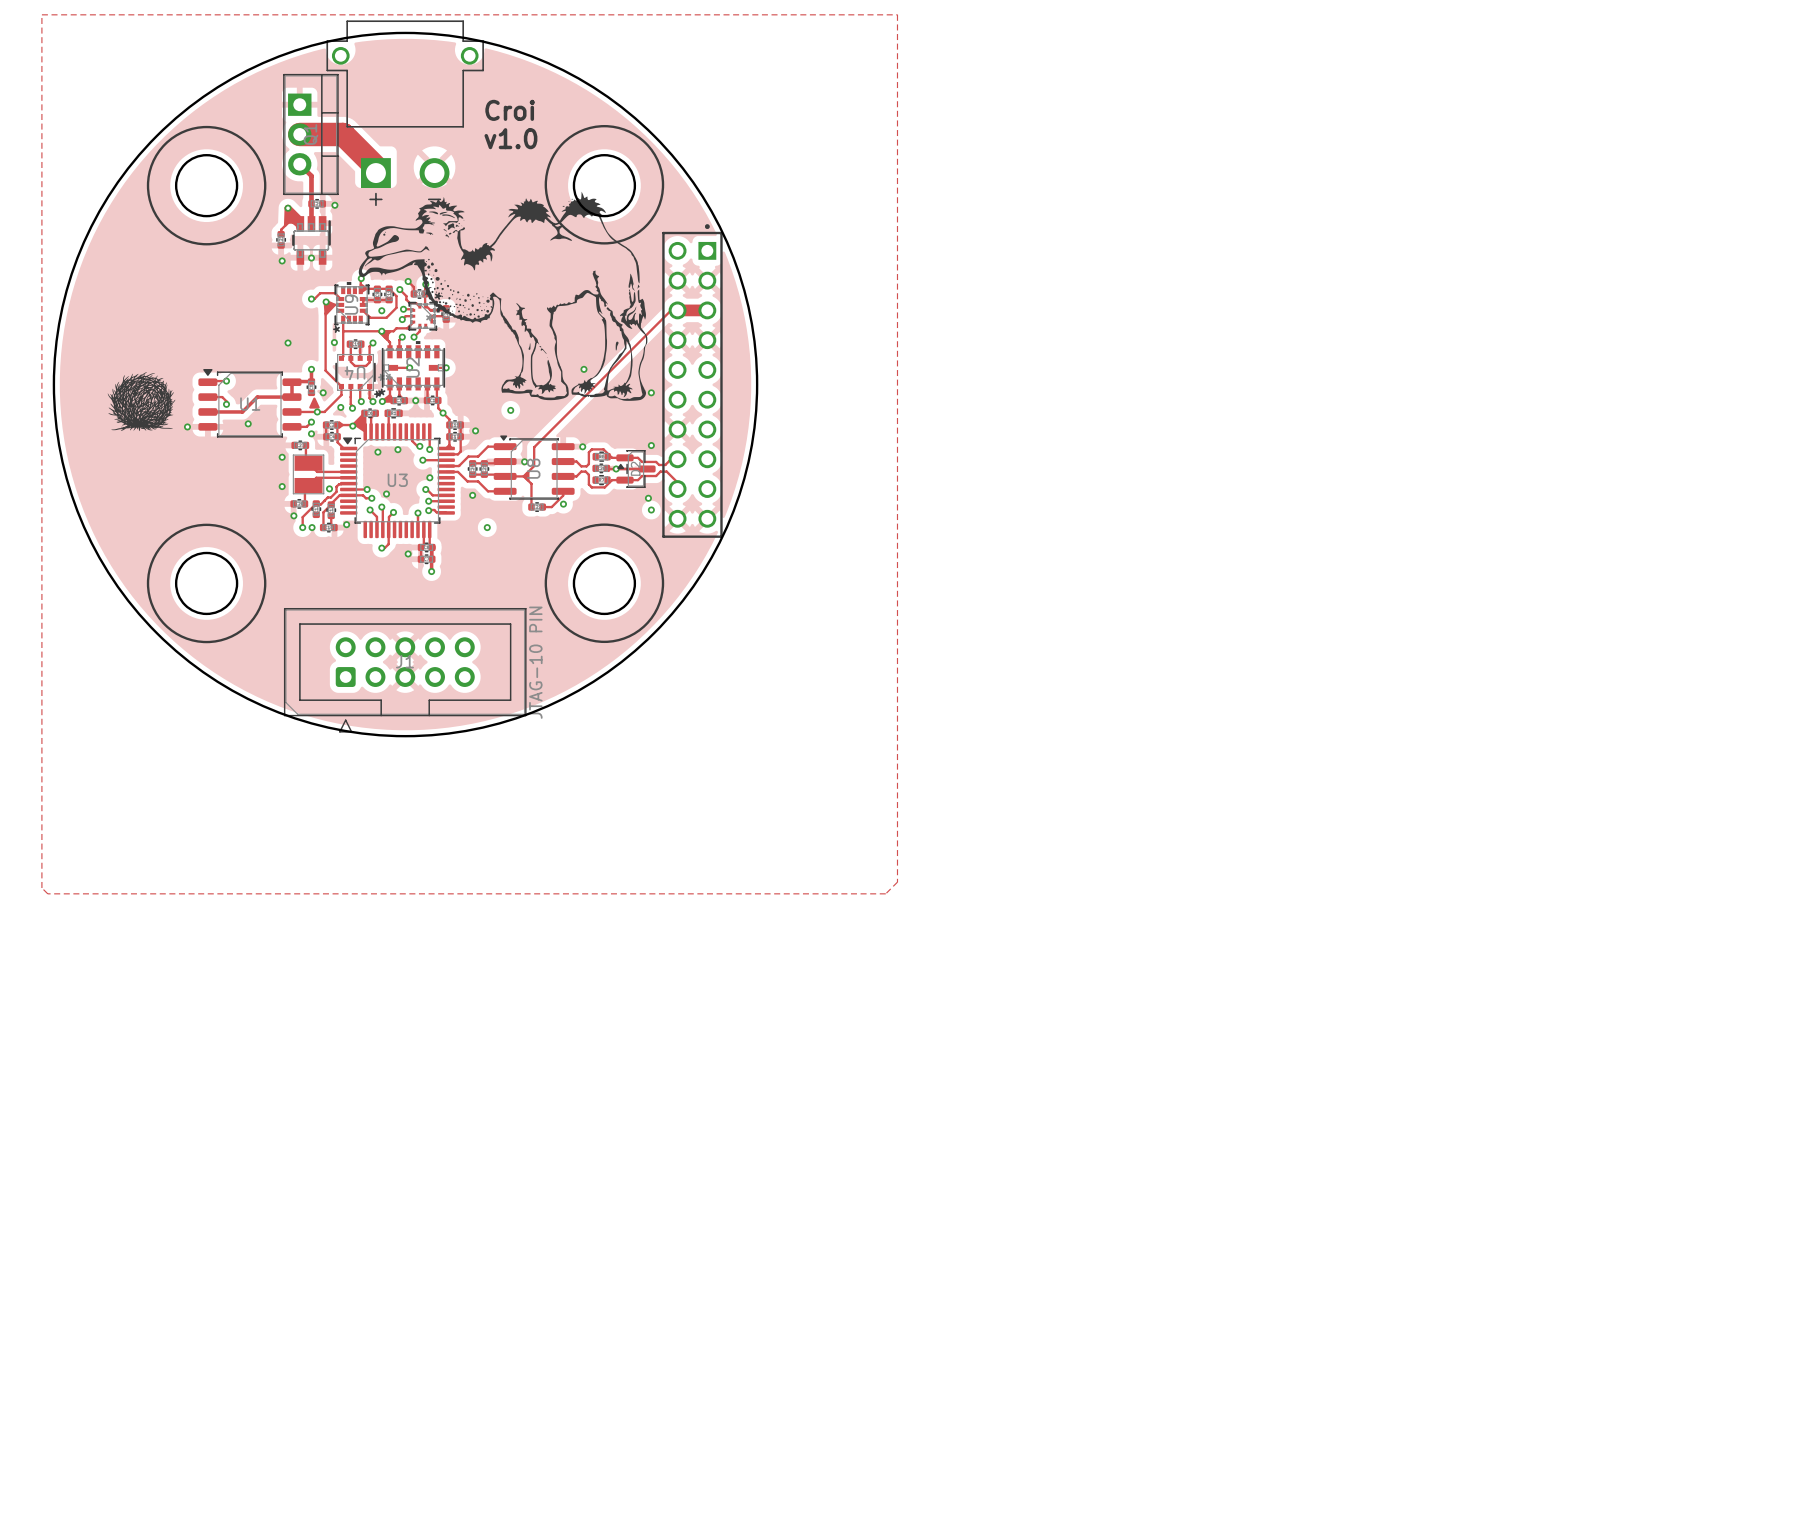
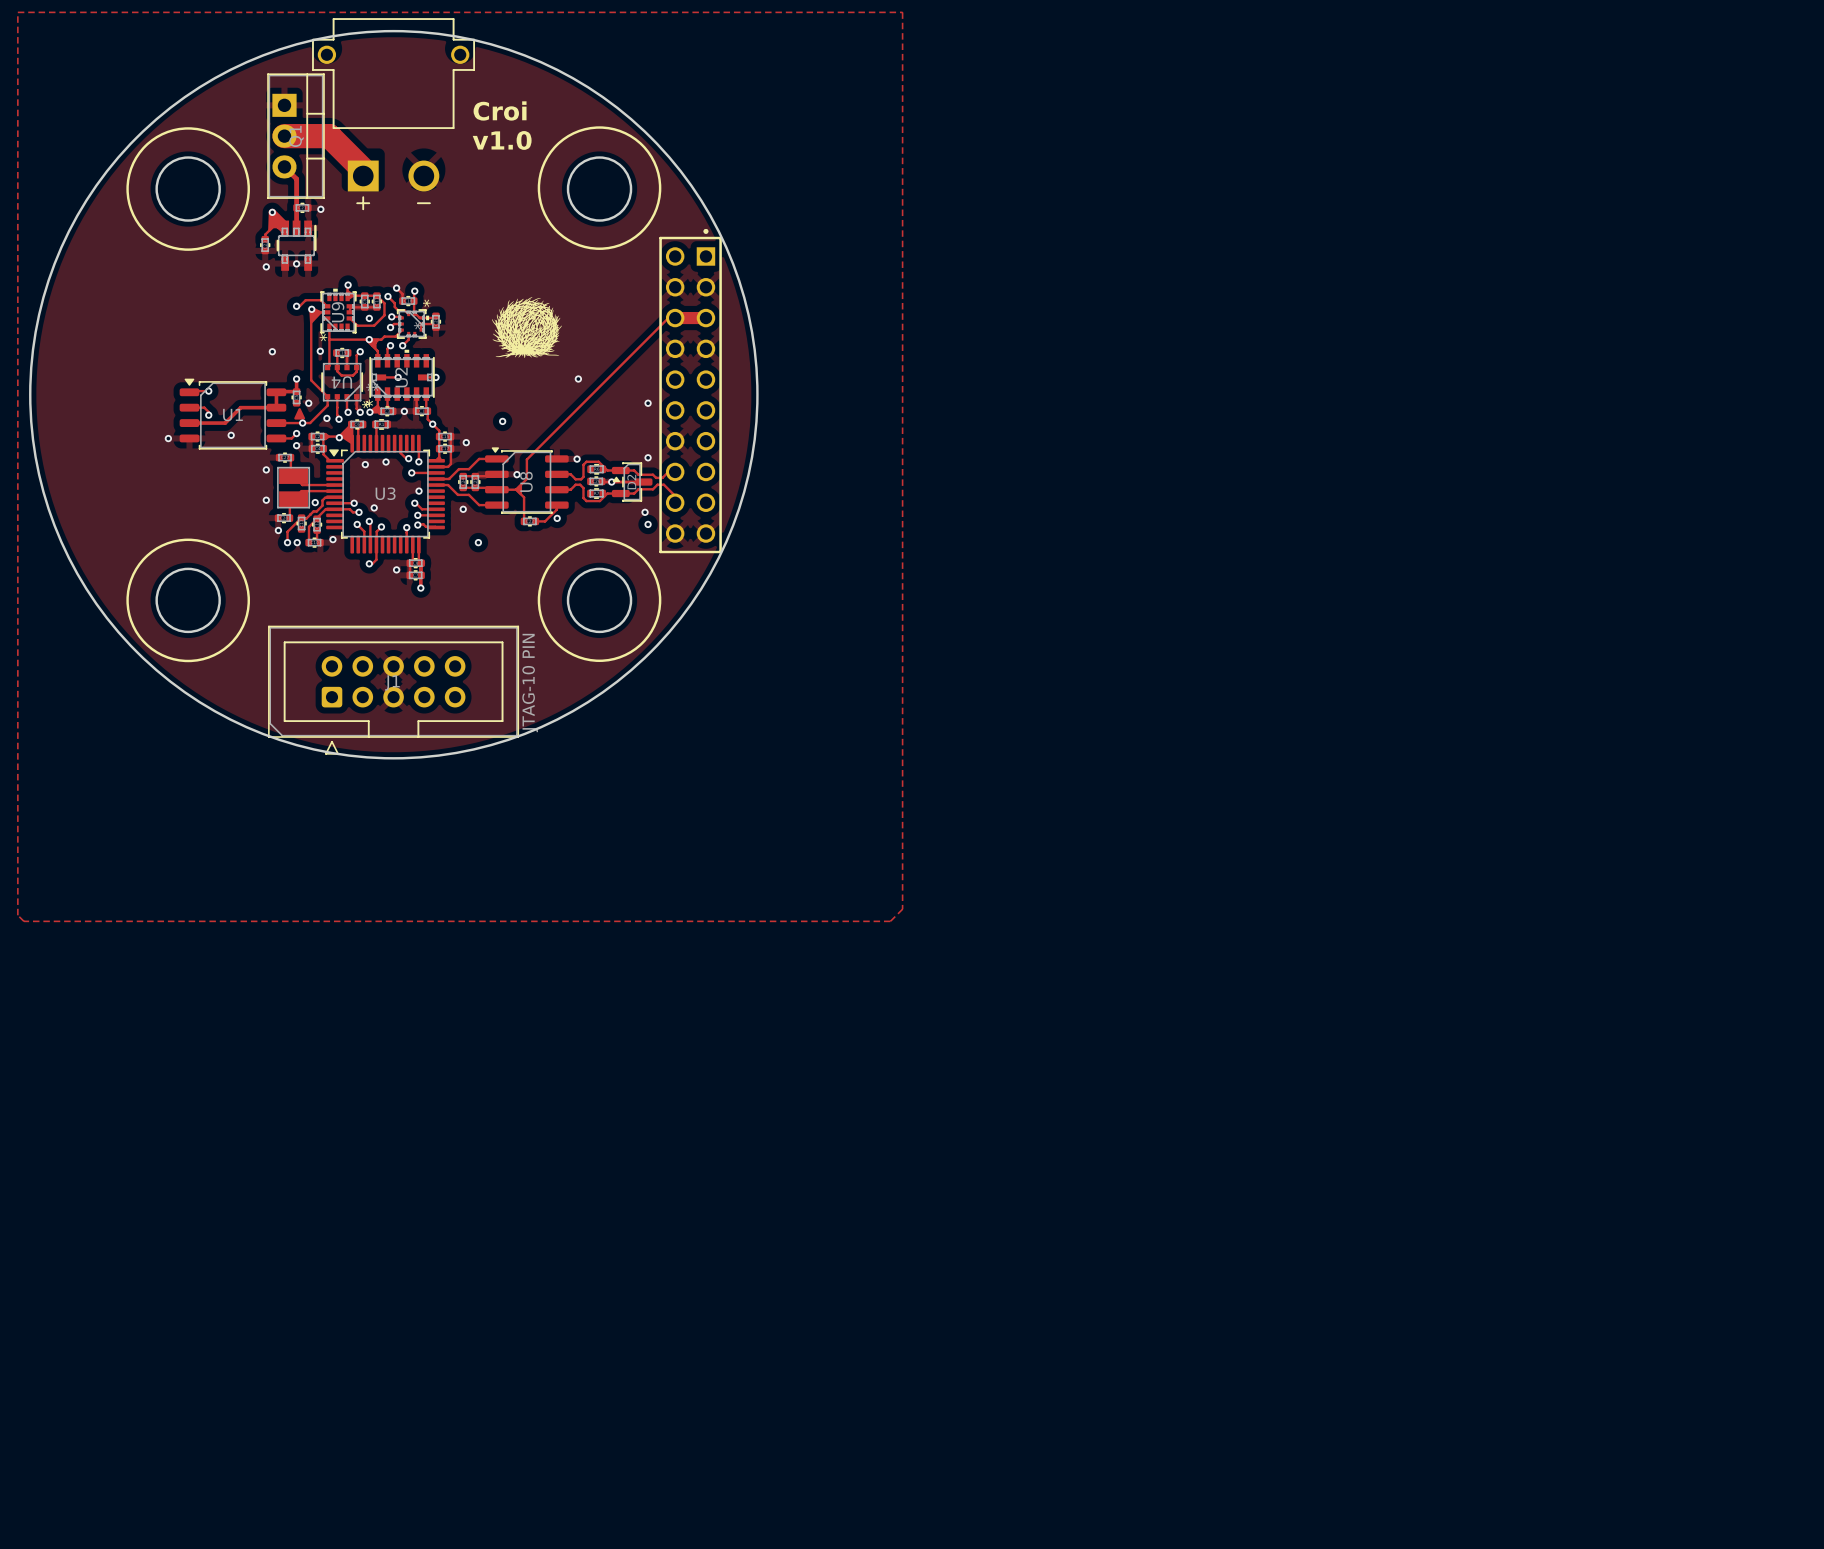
drawing: [358, 191, 648, 401] -> none
drawing: none -> [491, 297, 562, 359]
drawing: [107, 372, 176, 432] -> none

